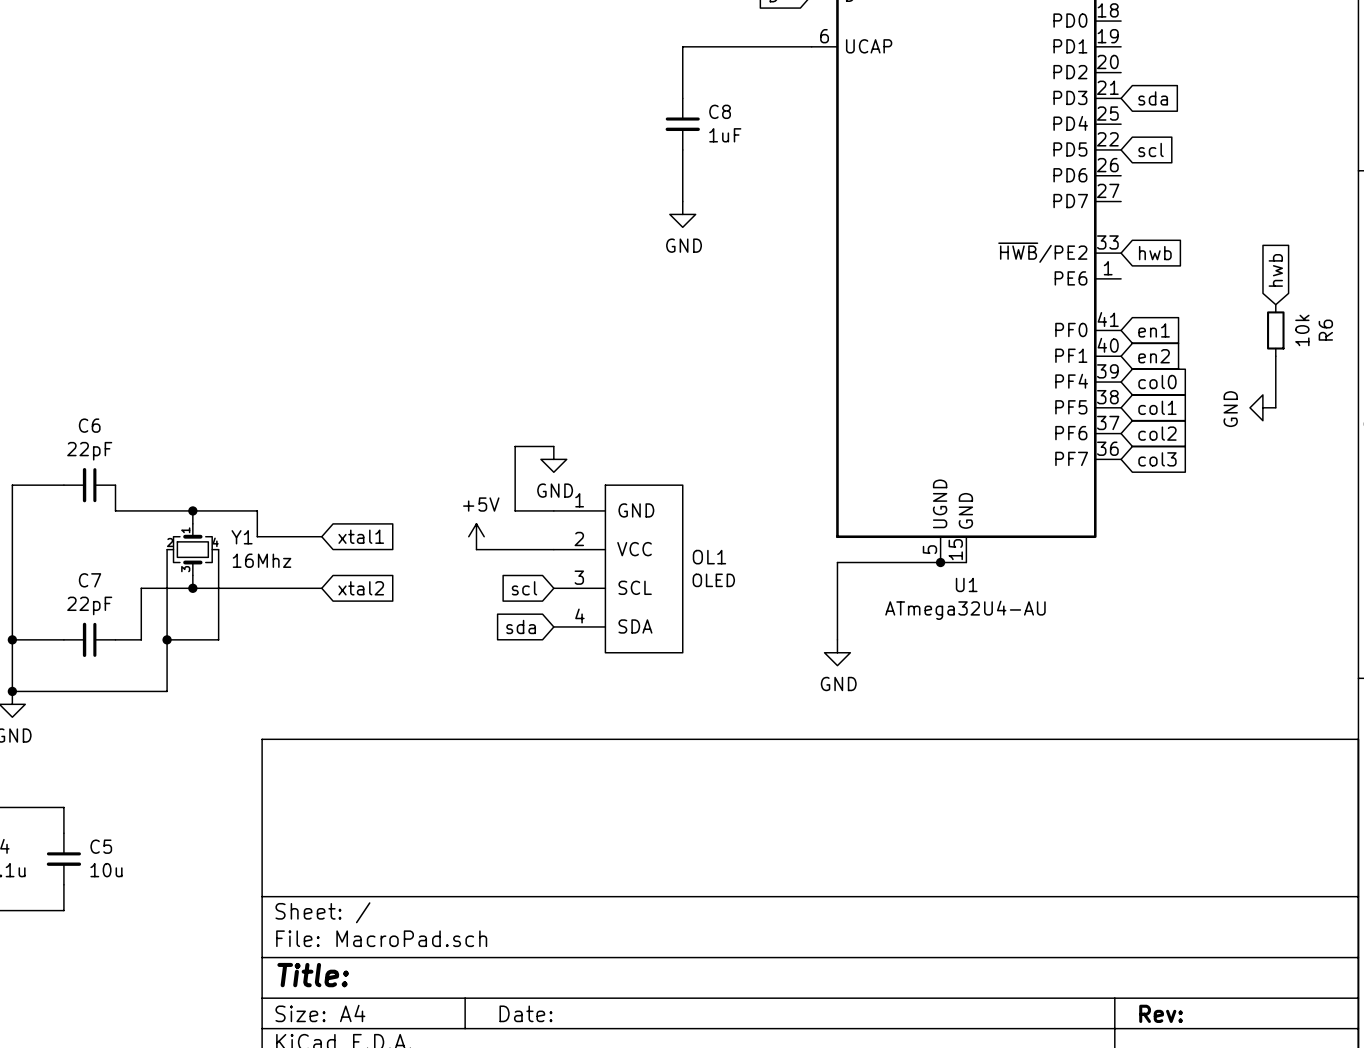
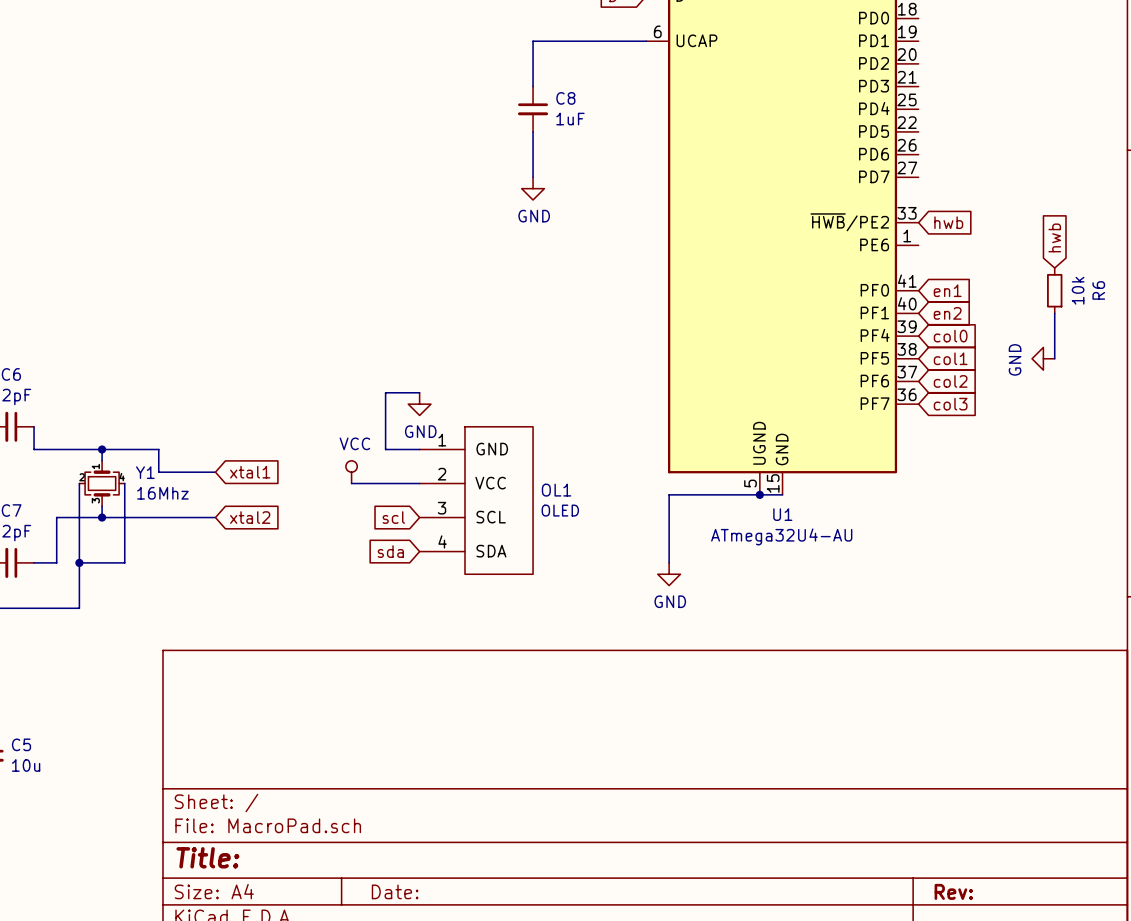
global label: sda (1153, 98) -> none
global label: scl (1151, 149) -> none
power symbol: +5V (476, 536) -> VCC (351, 472)

